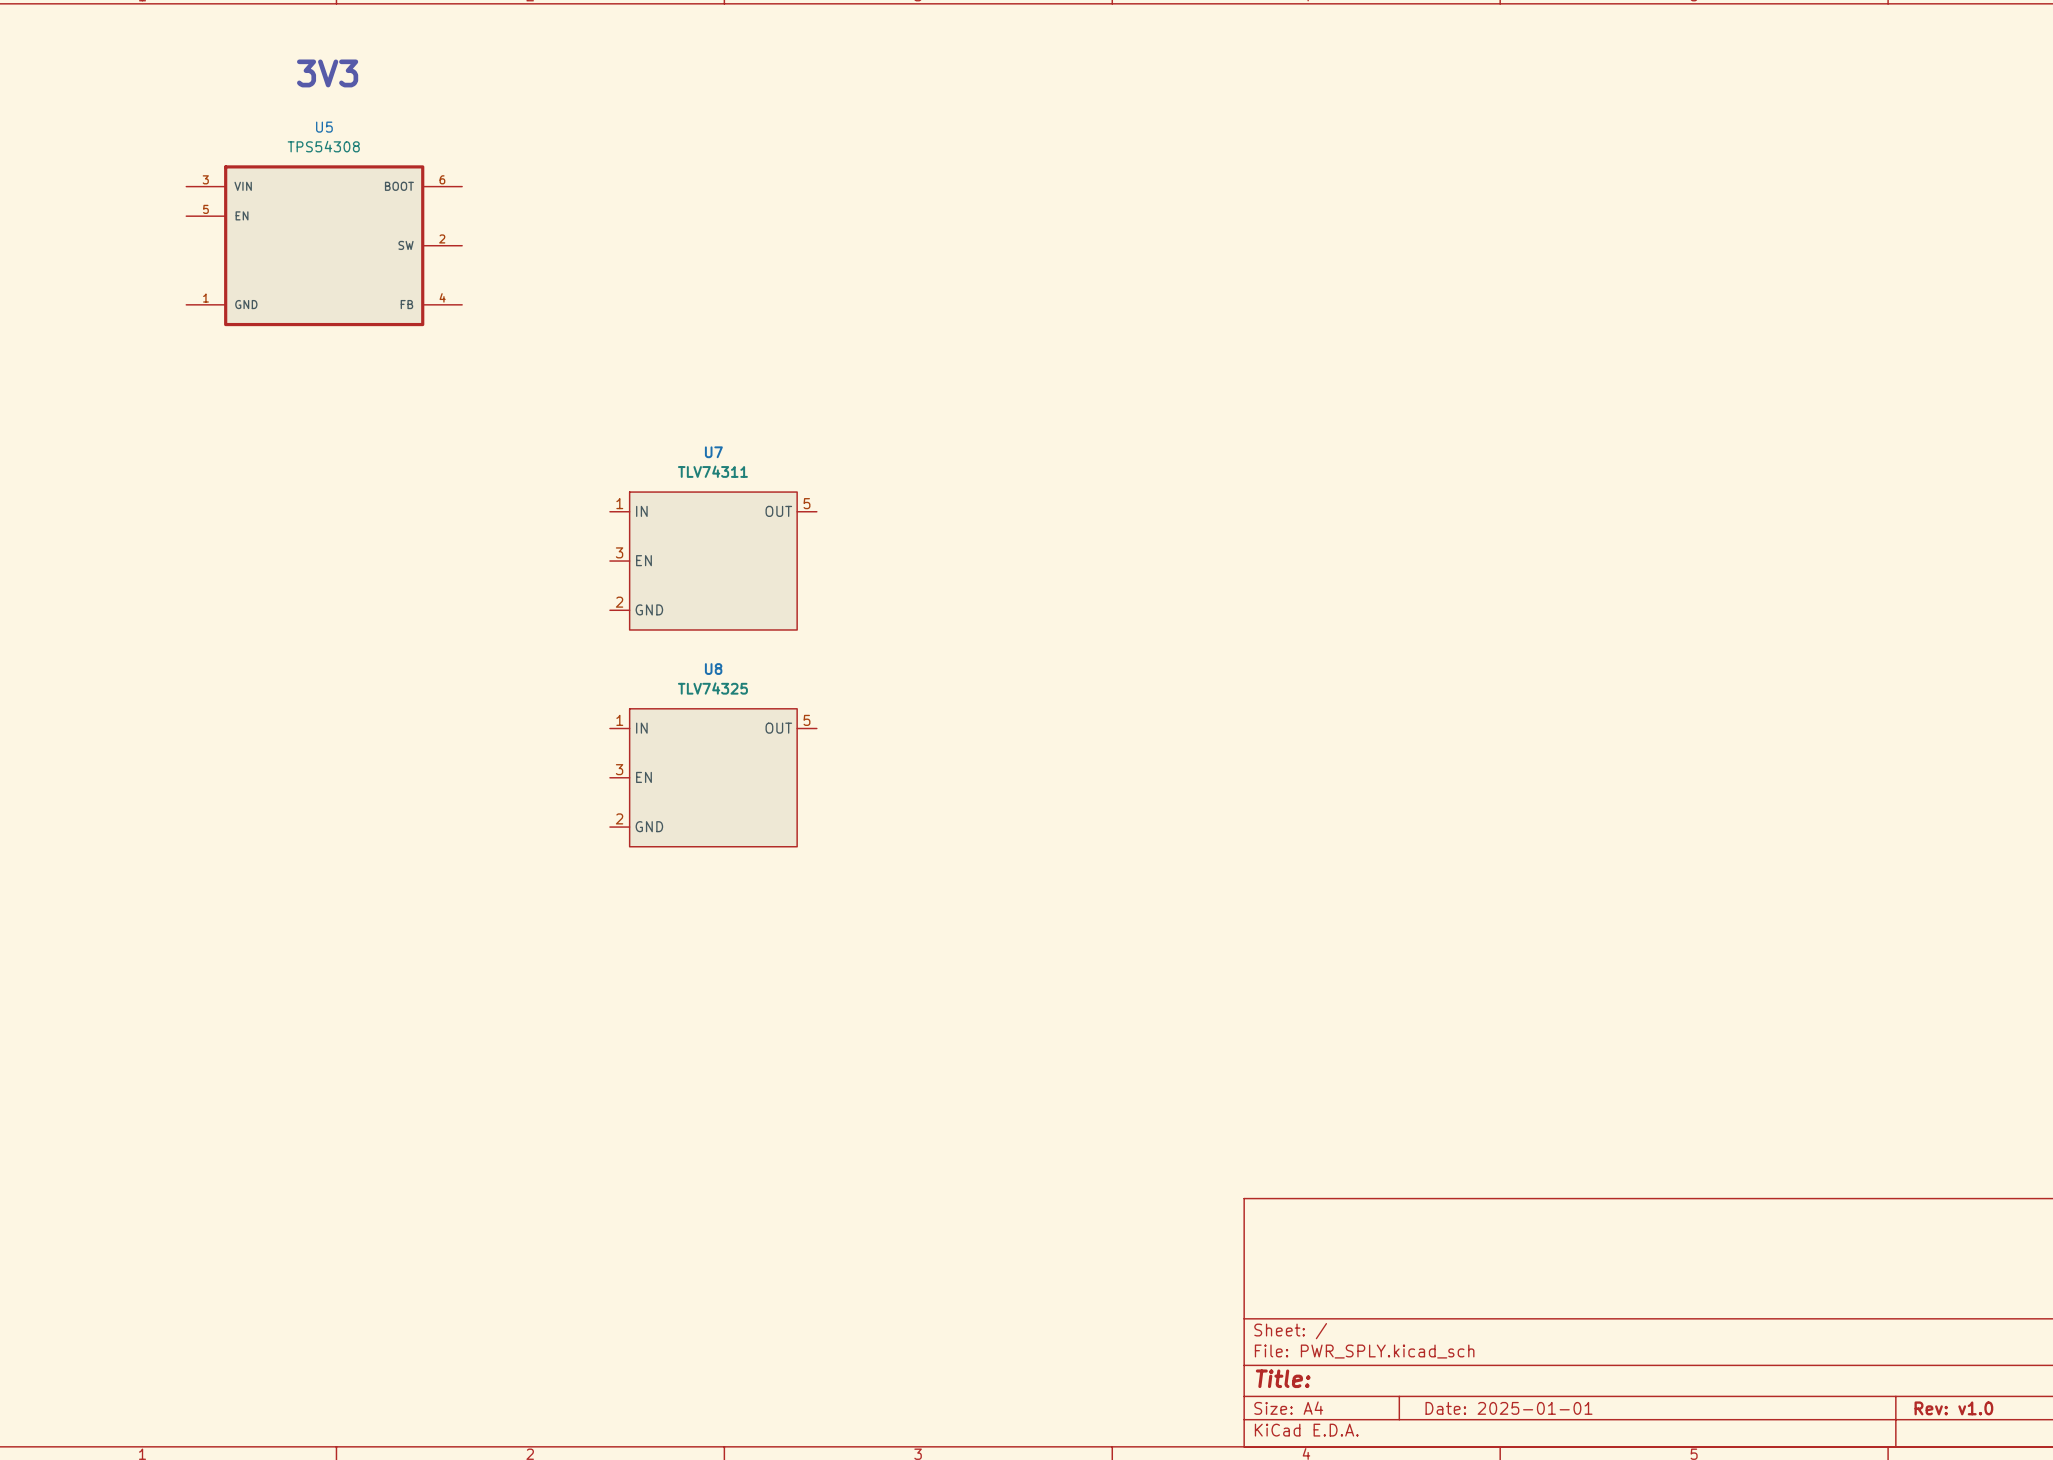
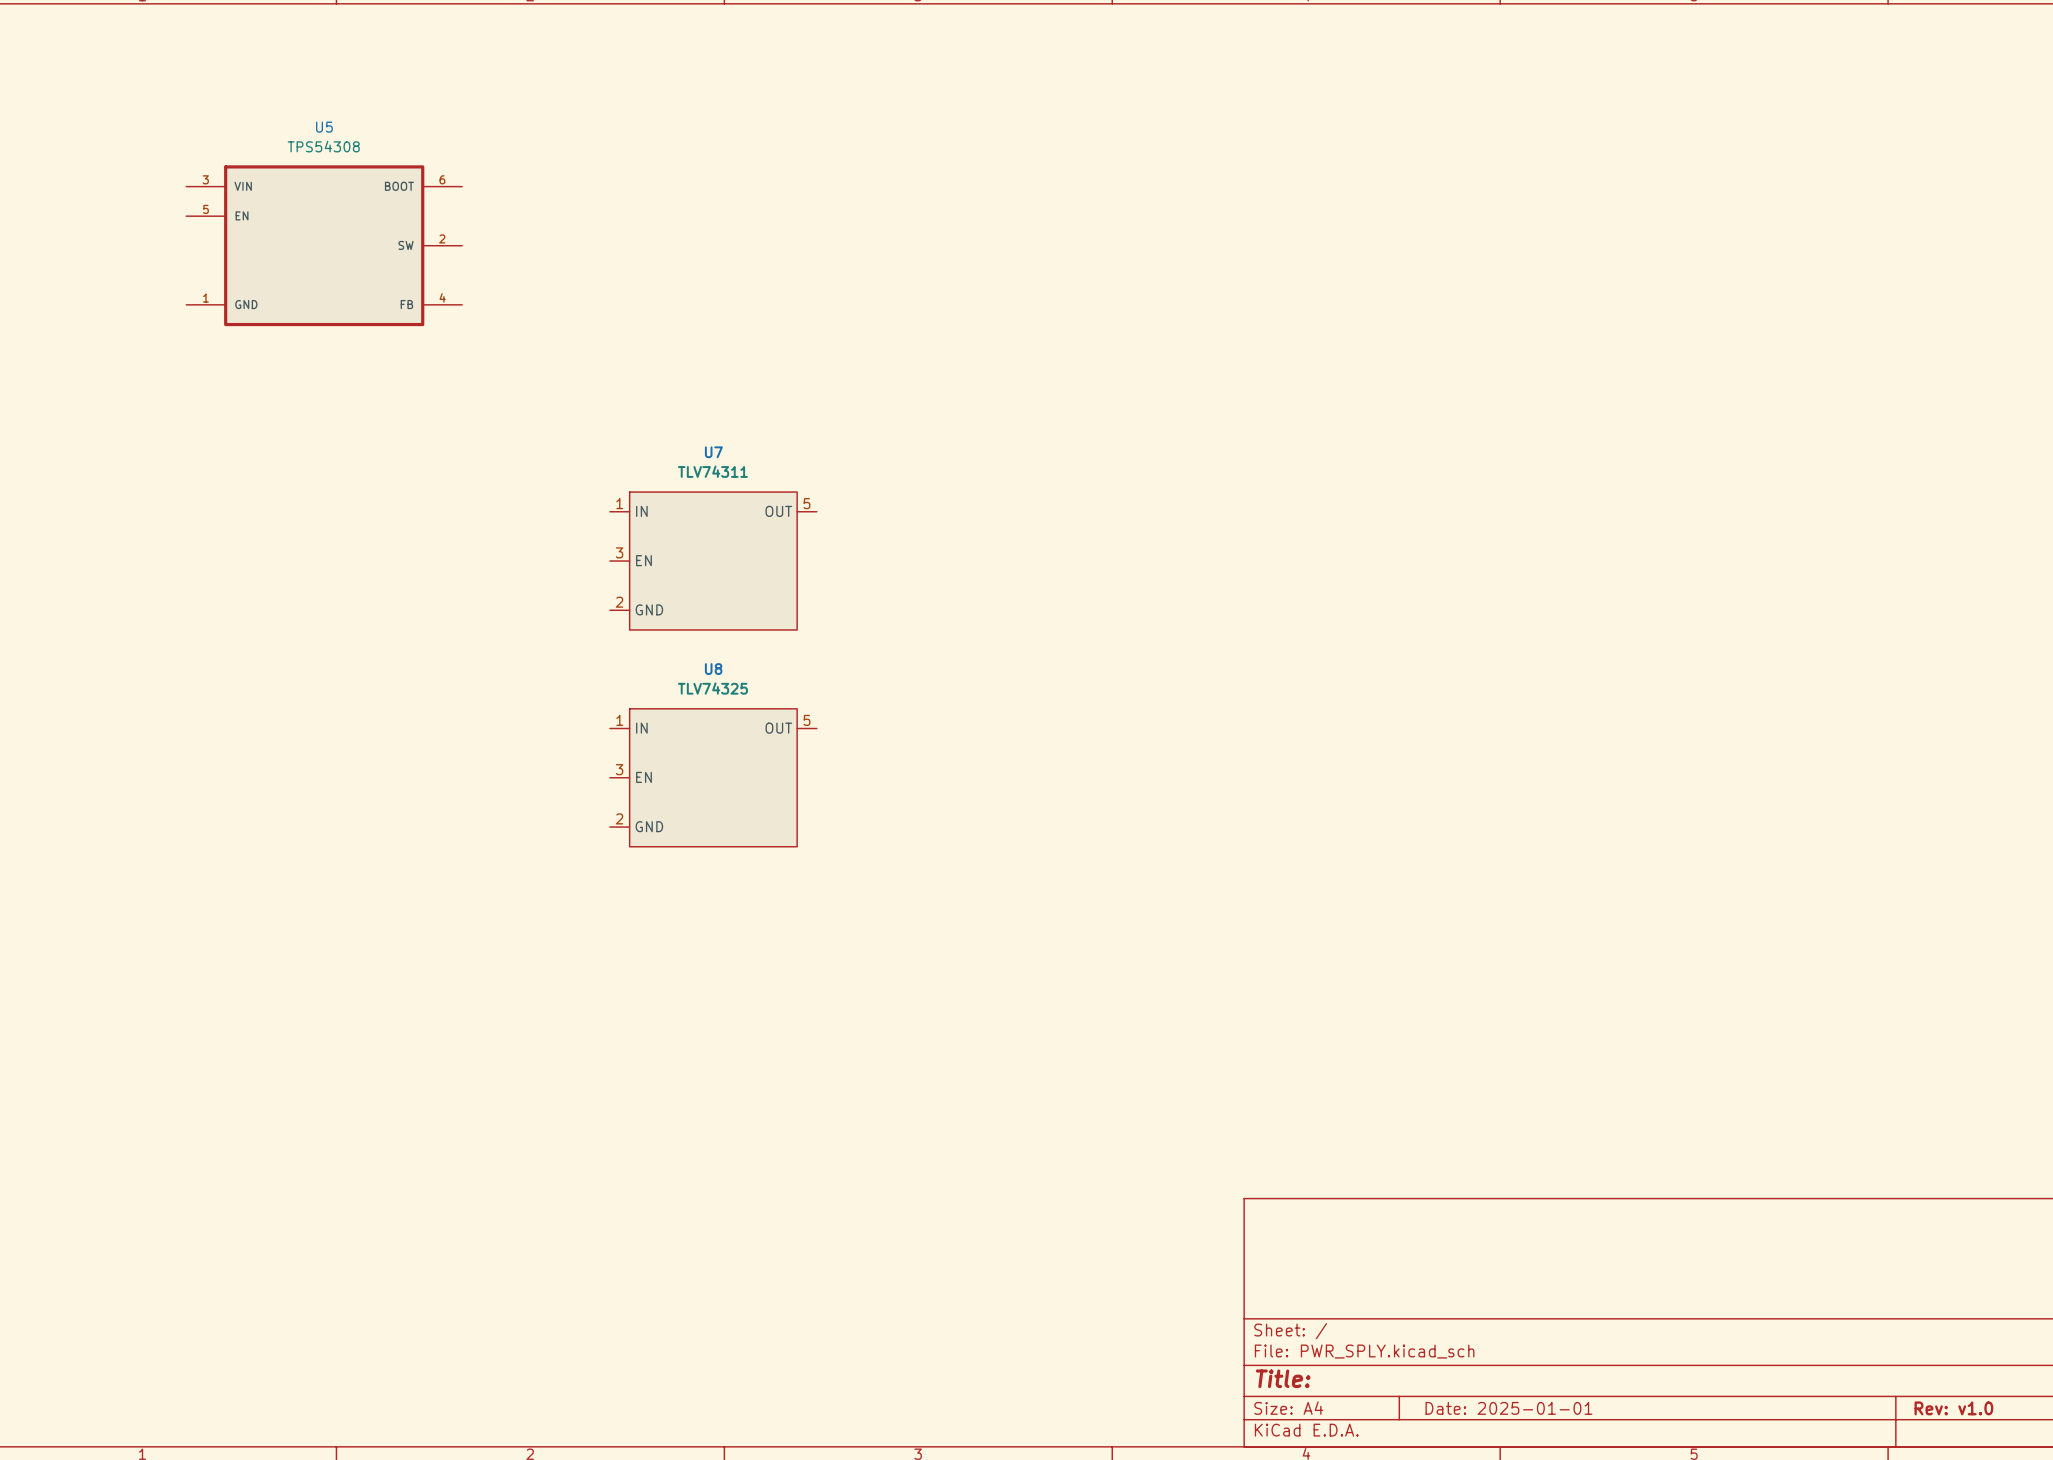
text: 3V3 (327, 73) -> none

